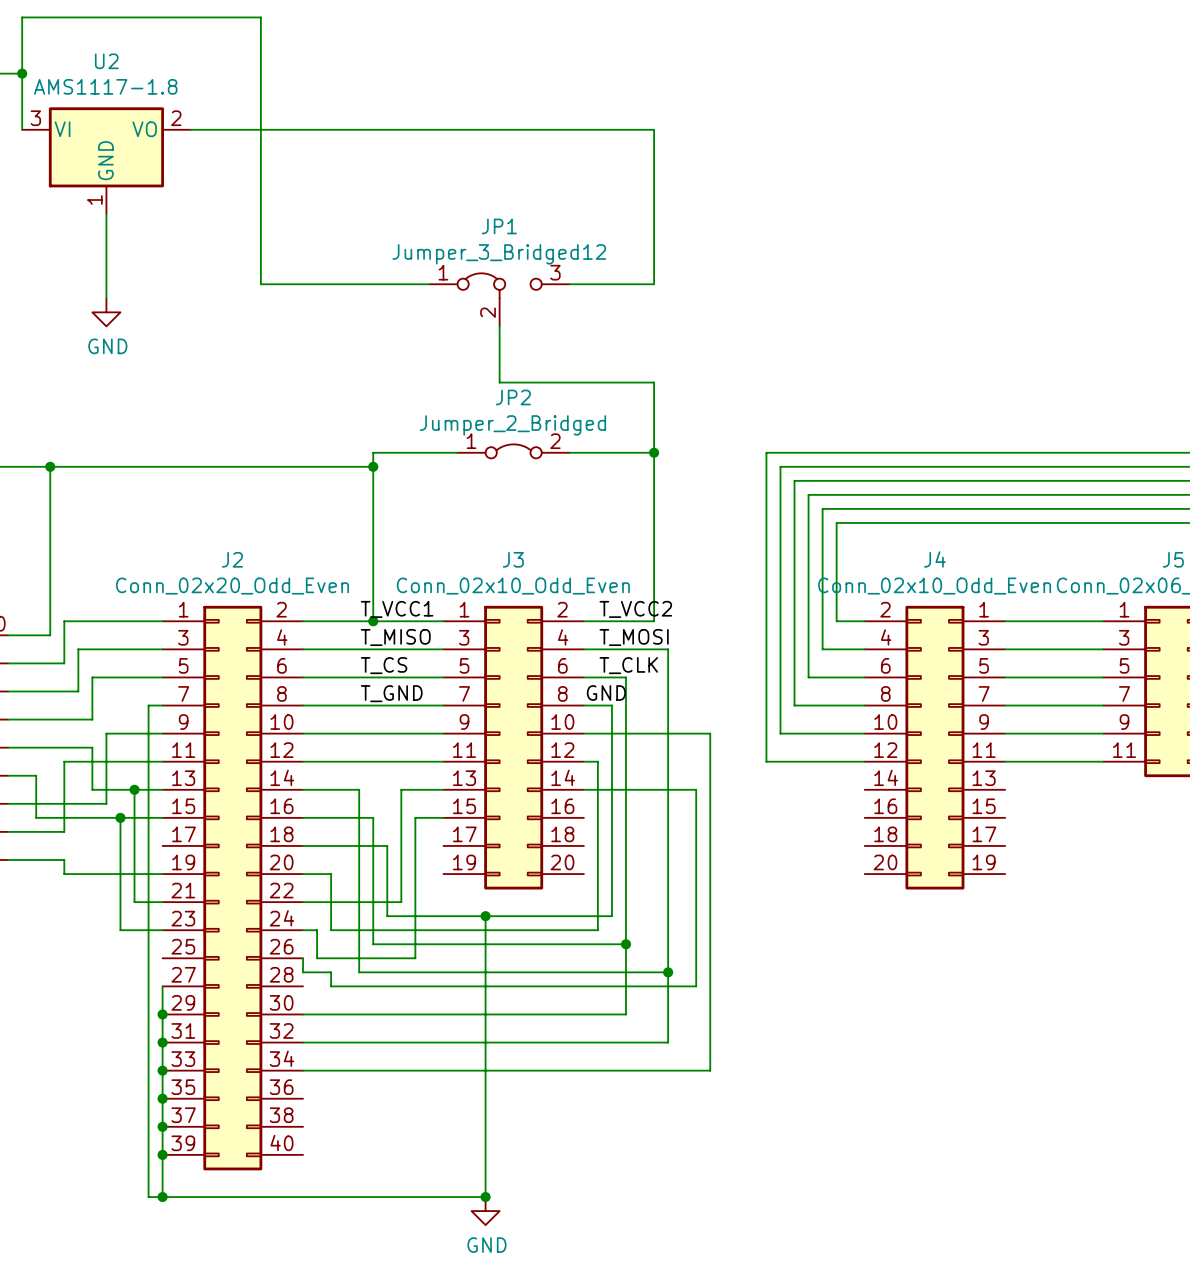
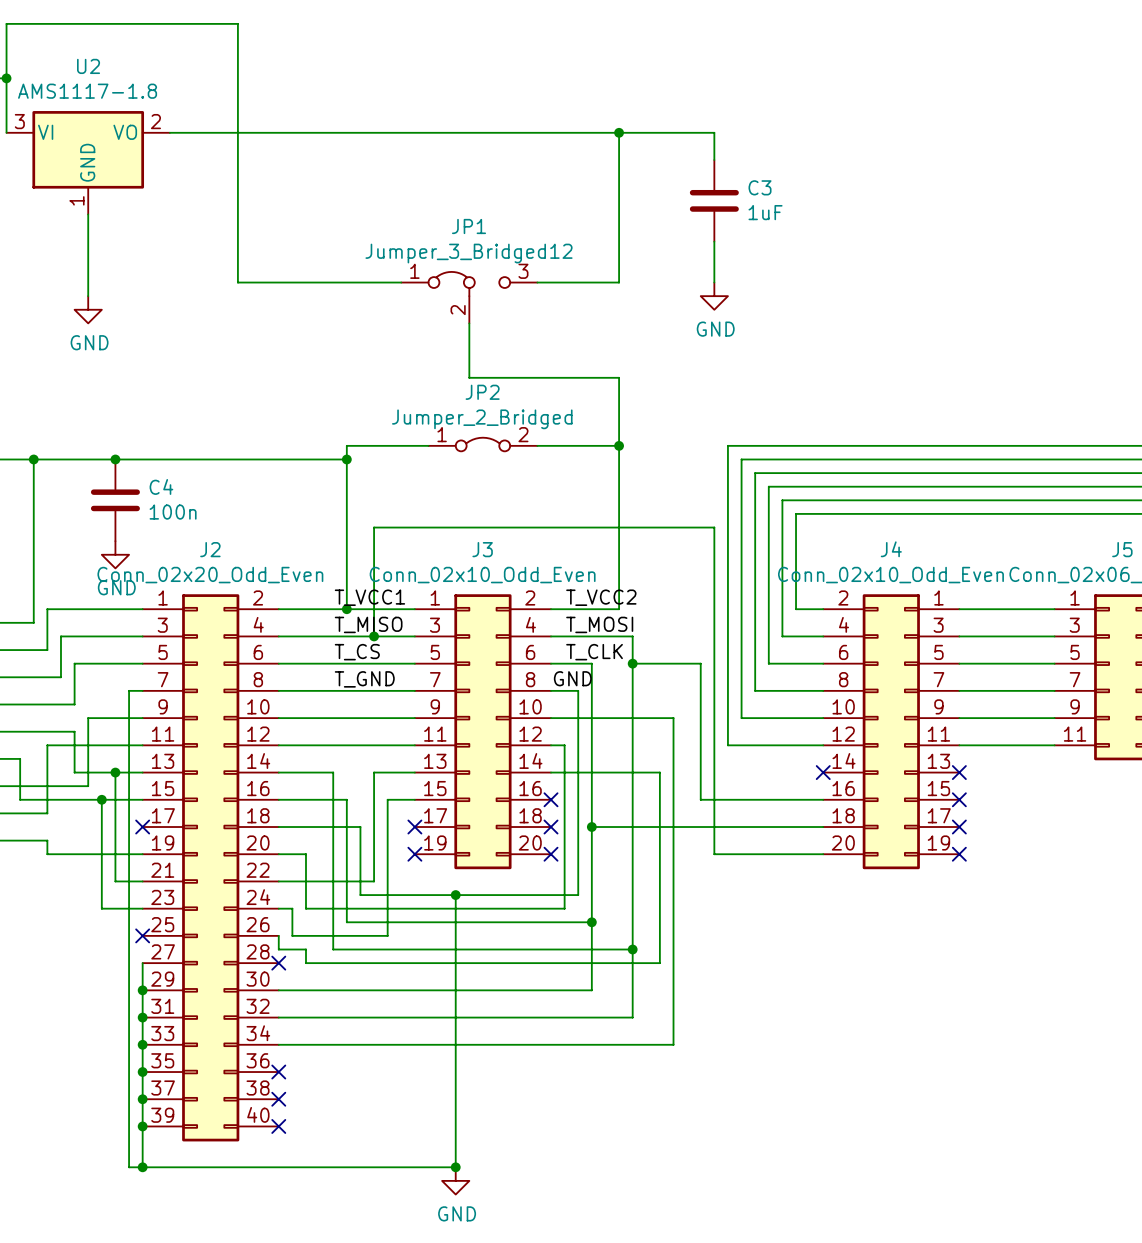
wire: none -> (619, 132) (714, 132) (714, 160)
junction: none -> (619, 132)
C3: none -> 1uF (714, 200)
wire: none -> (714, 241) (714, 282)
power symbol: none -> GND (714, 296)
junction: none -> (115, 459)
C4: none -> 100n (115, 500)
power symbol: none -> GND (115, 554)
wire: none -> (374, 636) (374, 527) (714, 527) (714, 854) (823, 854)
junction: none -> (374, 636)
wire: none -> (632, 663) (700, 663) (700, 799) (823, 799)
junction: none -> (632, 663)
no-connect mark: none -> (823, 772)
no-connect mark: none -> (959, 772)
no-connect mark: none -> (551, 799)
no-connect mark: none -> (959, 799)
no-connect mark: none -> (142, 827)
no-connect mark: none -> (414, 827)
no-connect mark: none -> (551, 827)
wire: none -> (591, 827) (823, 827)
junction: none -> (591, 827)
no-connect mark: none -> (959, 827)
no-connect mark: none -> (414, 854)
no-connect mark: none -> (551, 854)
no-connect mark: none -> (959, 854)
no-connect mark: none -> (142, 935)
no-connect mark: none -> (278, 963)
no-connect mark: none -> (278, 1072)
no-connect mark: none -> (278, 1099)
no-connect mark: none -> (278, 1126)

